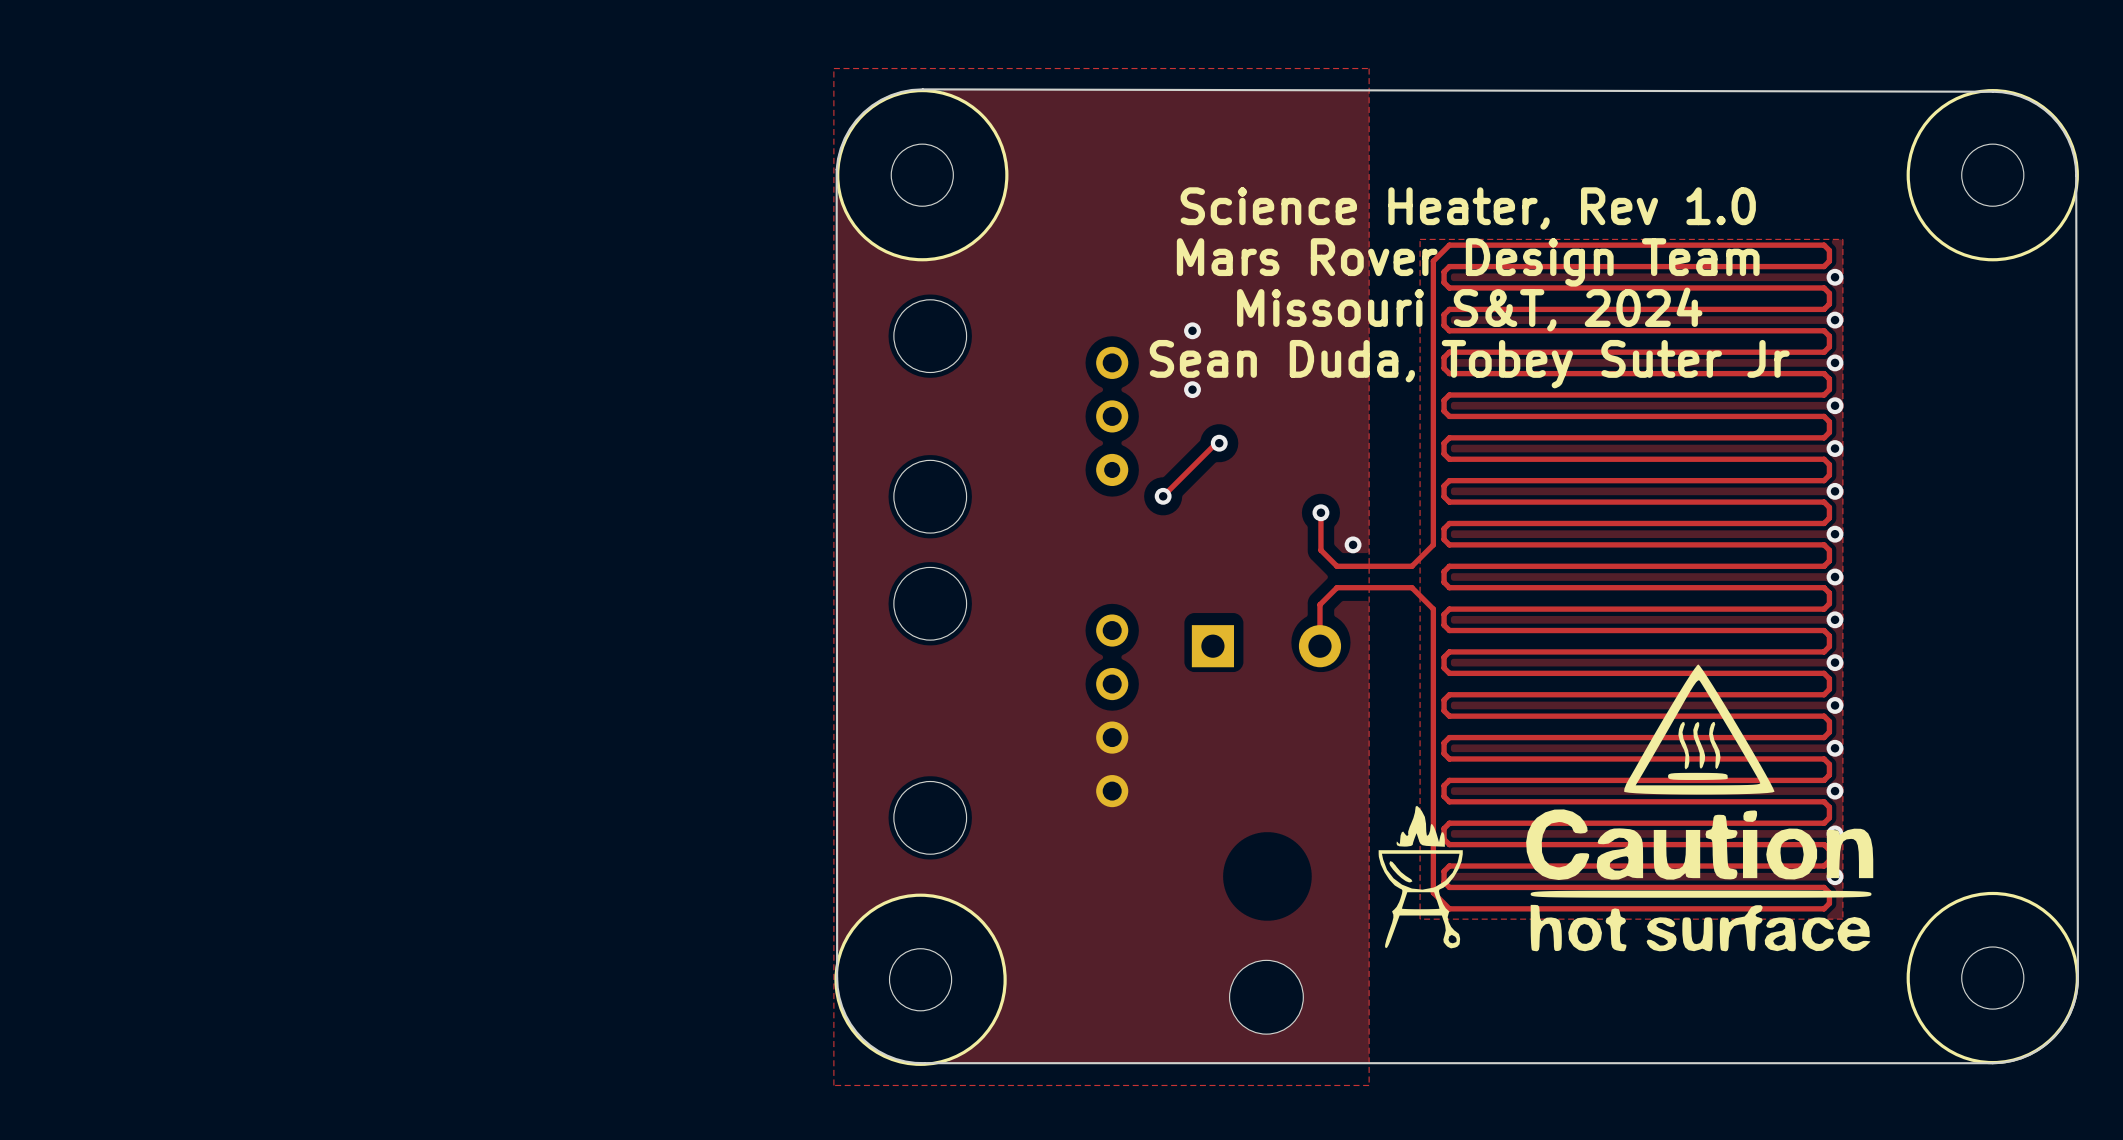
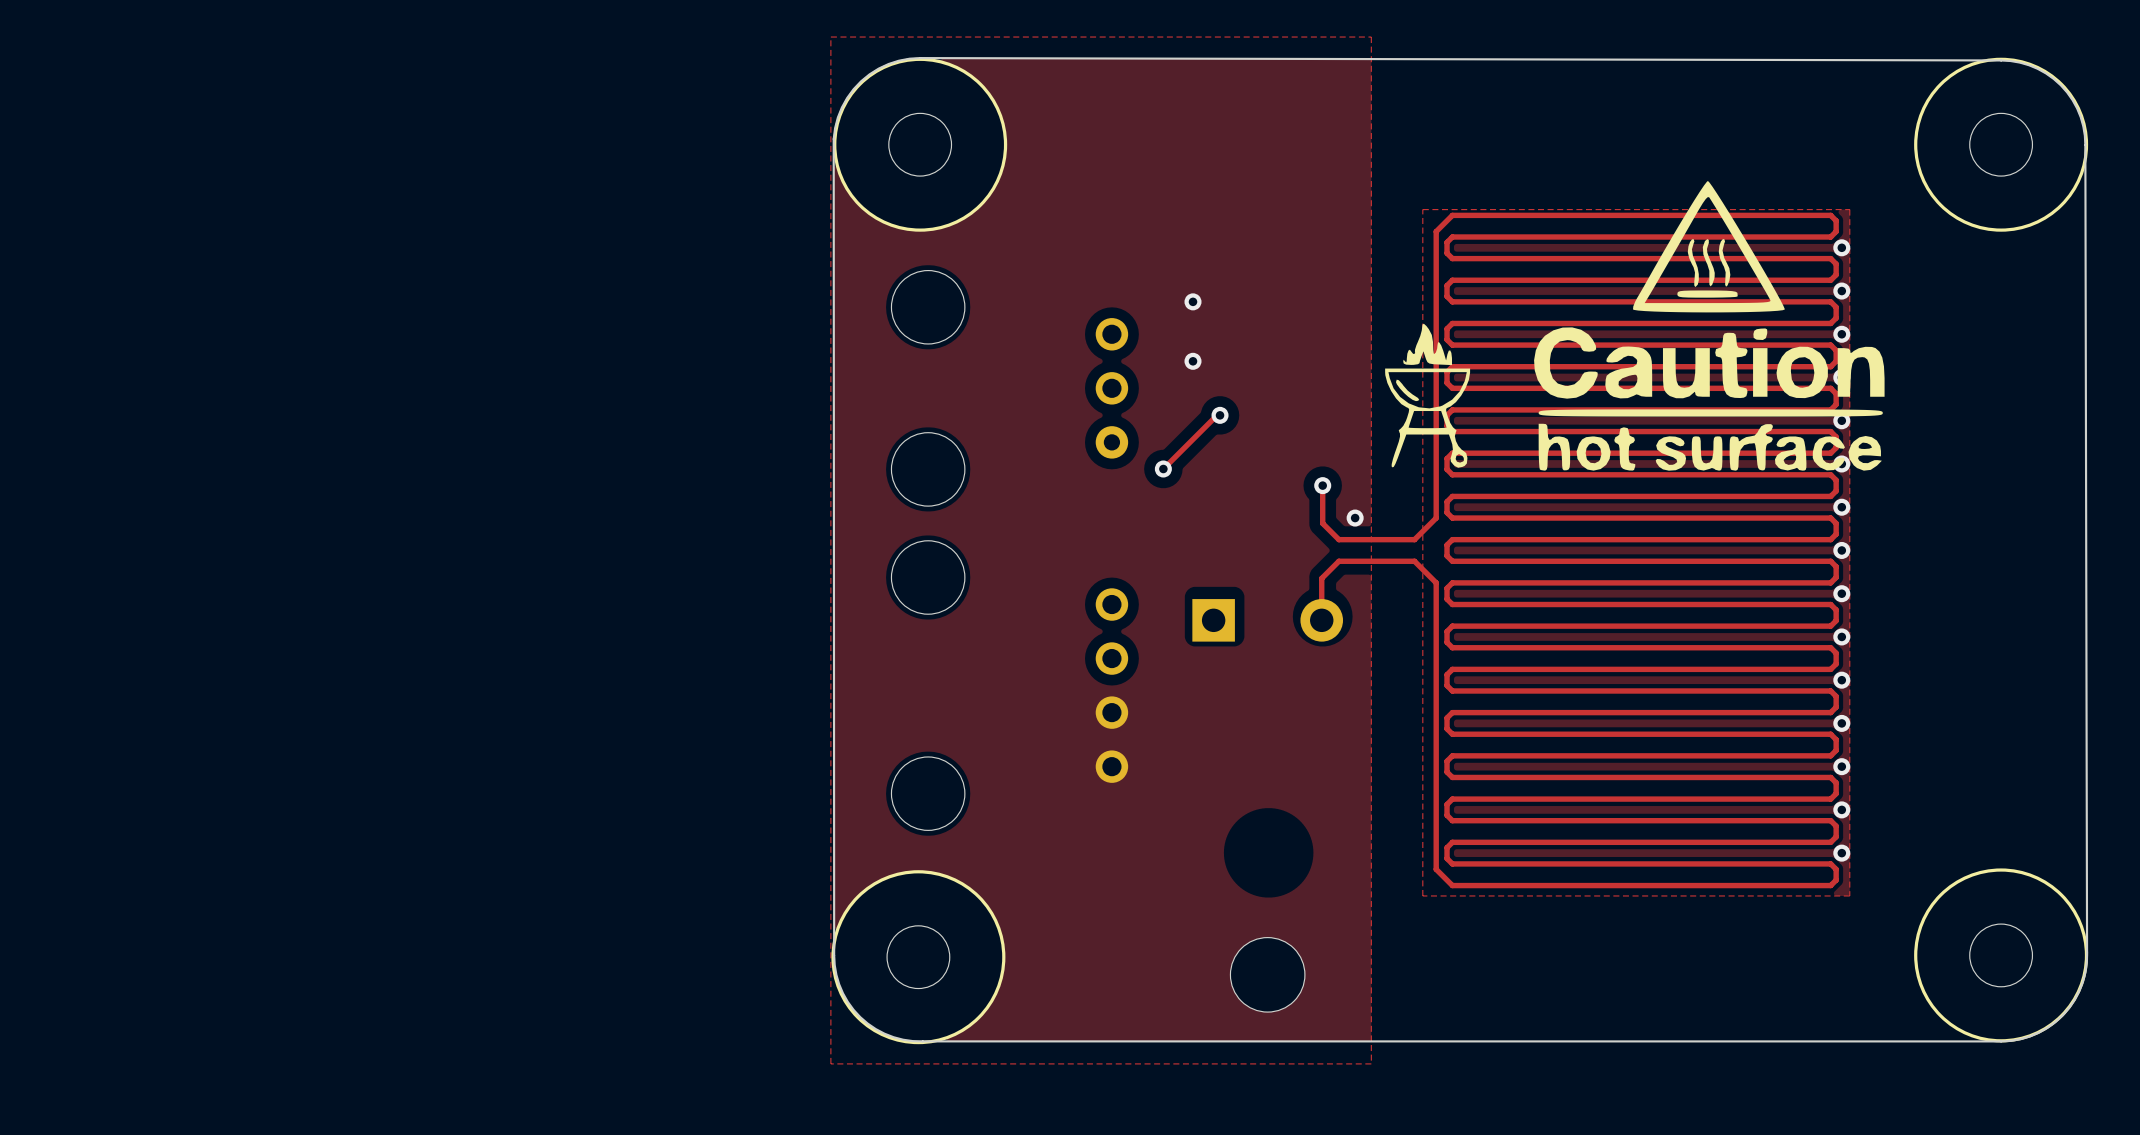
text: Science Heater, Rev 1.0 (1468, 208) -> none
text: Mars Rover Design Team (1468, 262) -> none
text: Missouri S&T, 2024 (1469, 309) -> none
text: Sean Duda, Tobey Suter Jr (1469, 364) -> none
drawing position: (1699, 807) -> (1709, 325)
drawing position: (1420, 877) -> (1427, 395)

